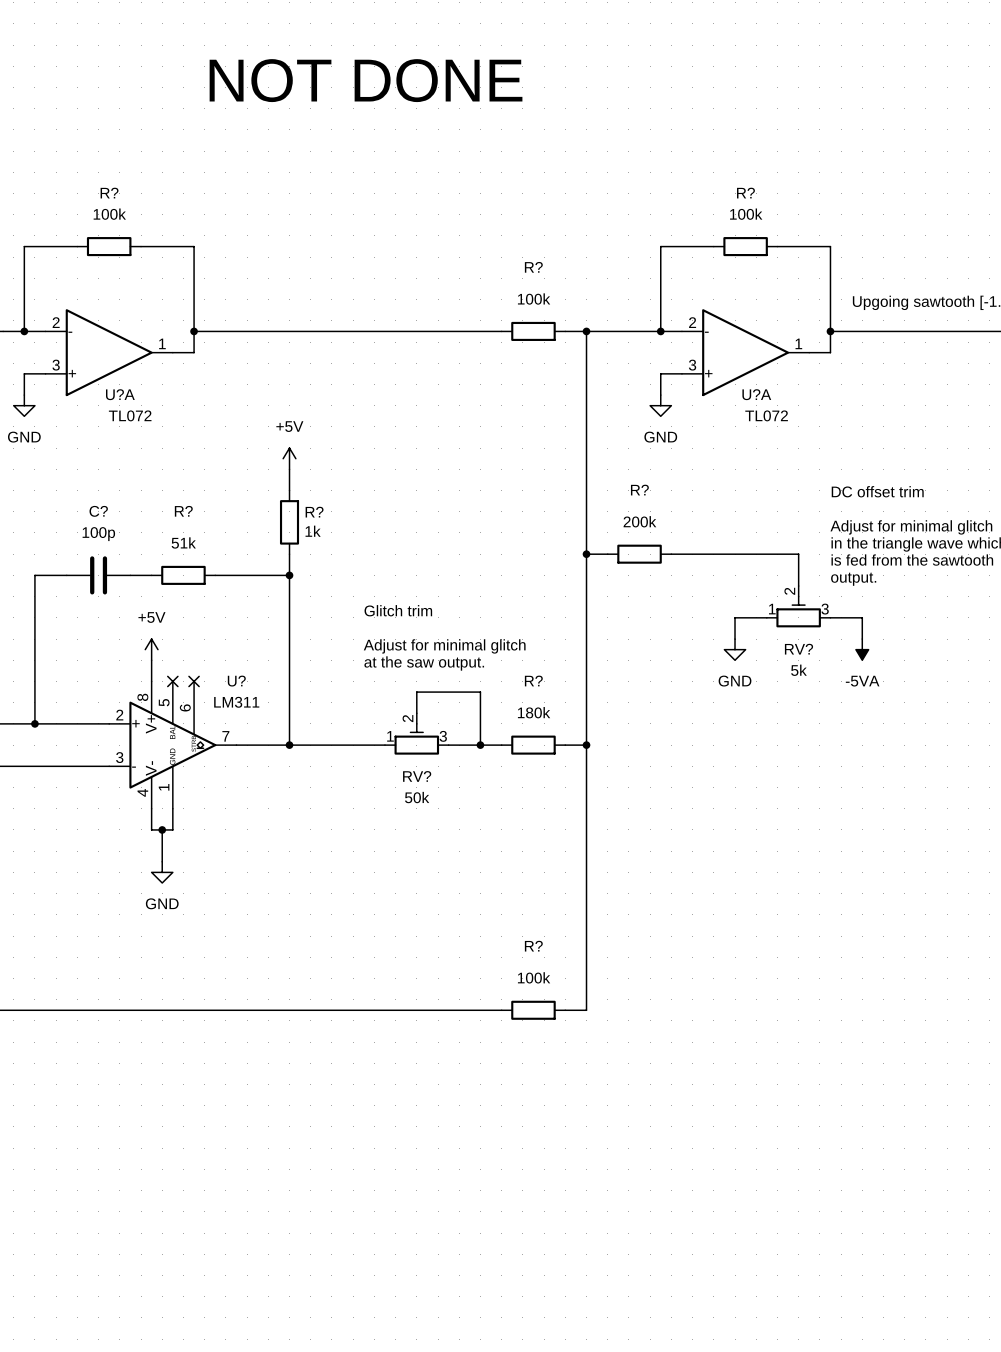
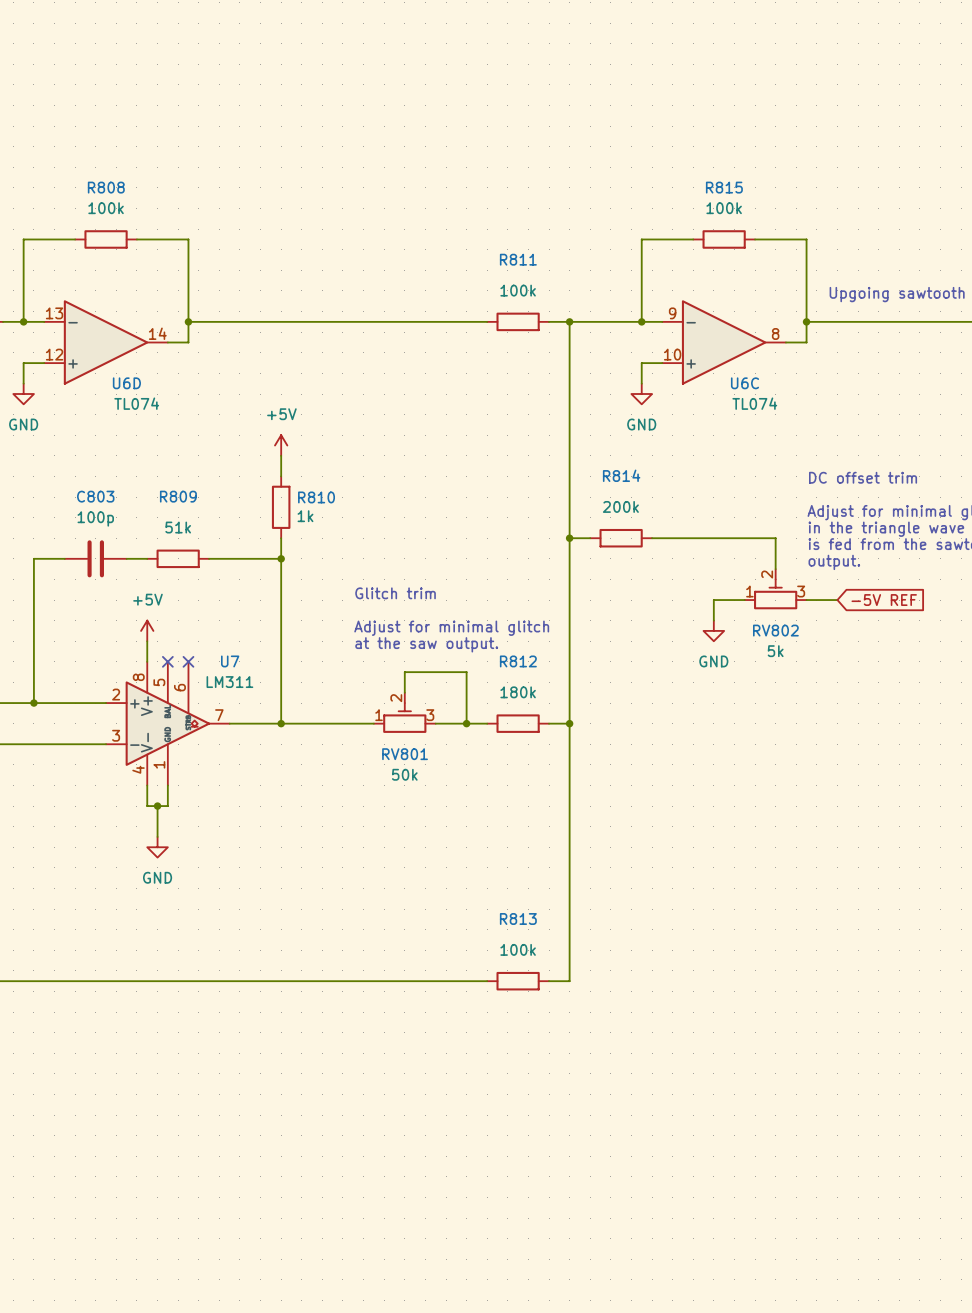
text: NOT DONE (366, 80) -> none
R? name: R? (109, 193) -> R808 (106, 187)
R? name: R? (745, 193) -> R815 (724, 187)
R? name: R? (533, 267) -> R811 (518, 259)
U?A pin number: 2 (56, 322) -> 13 (54, 313)
U?A pin number: 2 (692, 322) -> 9 (672, 313)
U?A pin number: 1 (162, 343) -> 14 (157, 333)
U?A pin number: 1 (798, 343) -> 8 (775, 333)
U?A pin number: 3 (56, 365) -> 12 (54, 354)
U?A pin number: 3 (692, 365) -> 10 (672, 354)
U?A name: U?A (120, 394) -> U6D (126, 383)
U?A name: U?A (756, 394) -> U6C (744, 383)
U?A value: TL072 (130, 415) -> TL074 (136, 403)
U?A value: TL072 (766, 415) -> TL074 (754, 403)
R? name: R? (639, 490) -> R814 (621, 475)
C? name: C? (98, 511) -> C803 (95, 496)
R? name: R? (183, 511) -> R809 (178, 496)
R? name: R? (314, 512) -> R810 (316, 497)
wire: (862, 617) (862, 639) -> none
global label: none -> -5V REF (884, 600)
RV? name: RV? (798, 649) -> RV802 (775, 630)
power symbol: -5VA (862, 649) -> none
R? name: R? (533, 680) -> R812 (518, 661)
U? name: U? (236, 681) -> U7 (230, 661)
RV? name: RV? (417, 776) -> RV801 (405, 754)
R? name: R? (533, 946) -> R813 (518, 918)

